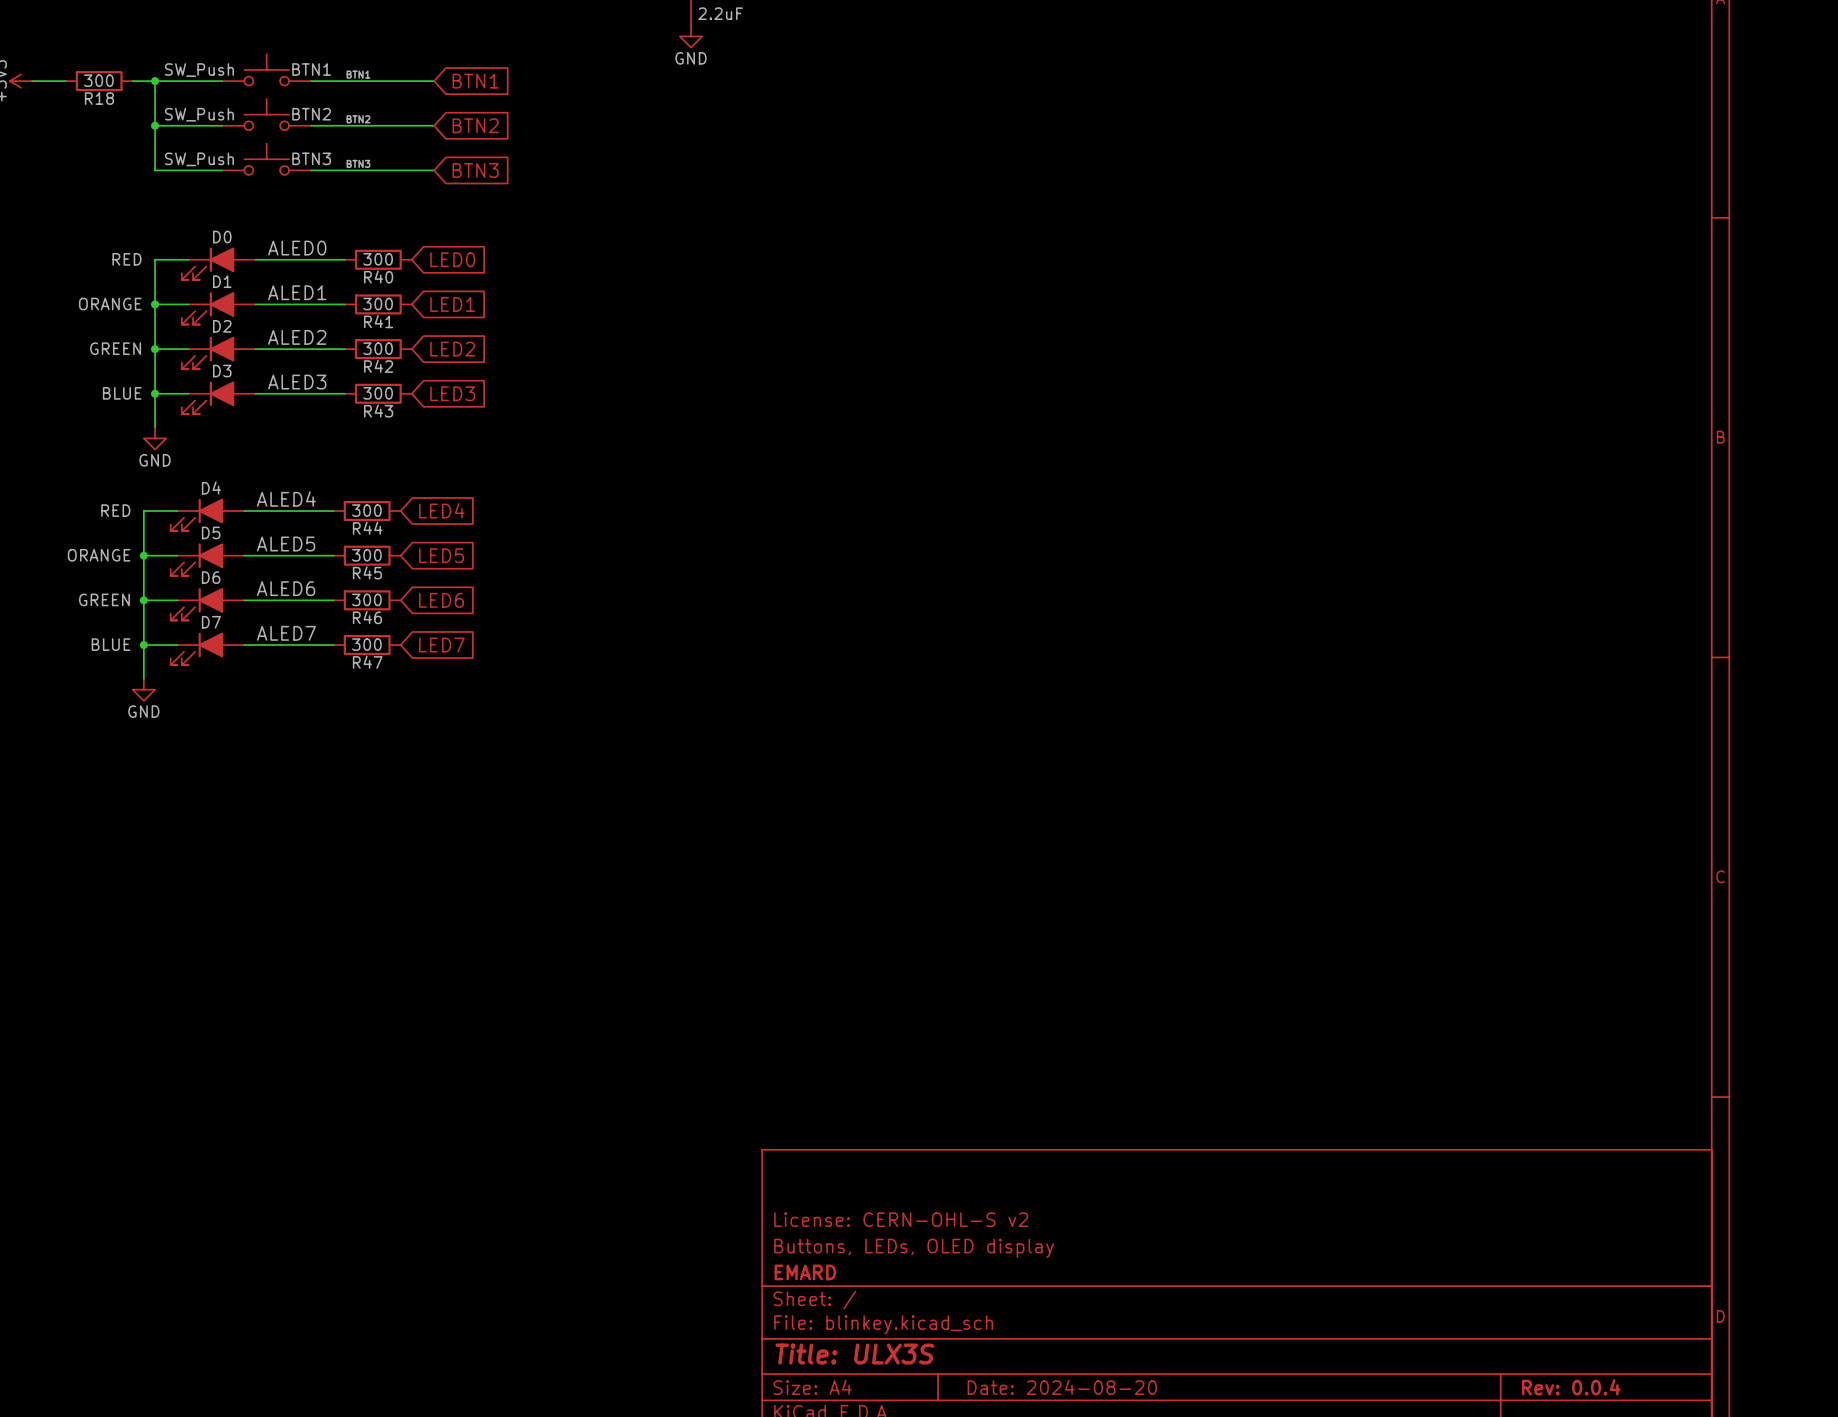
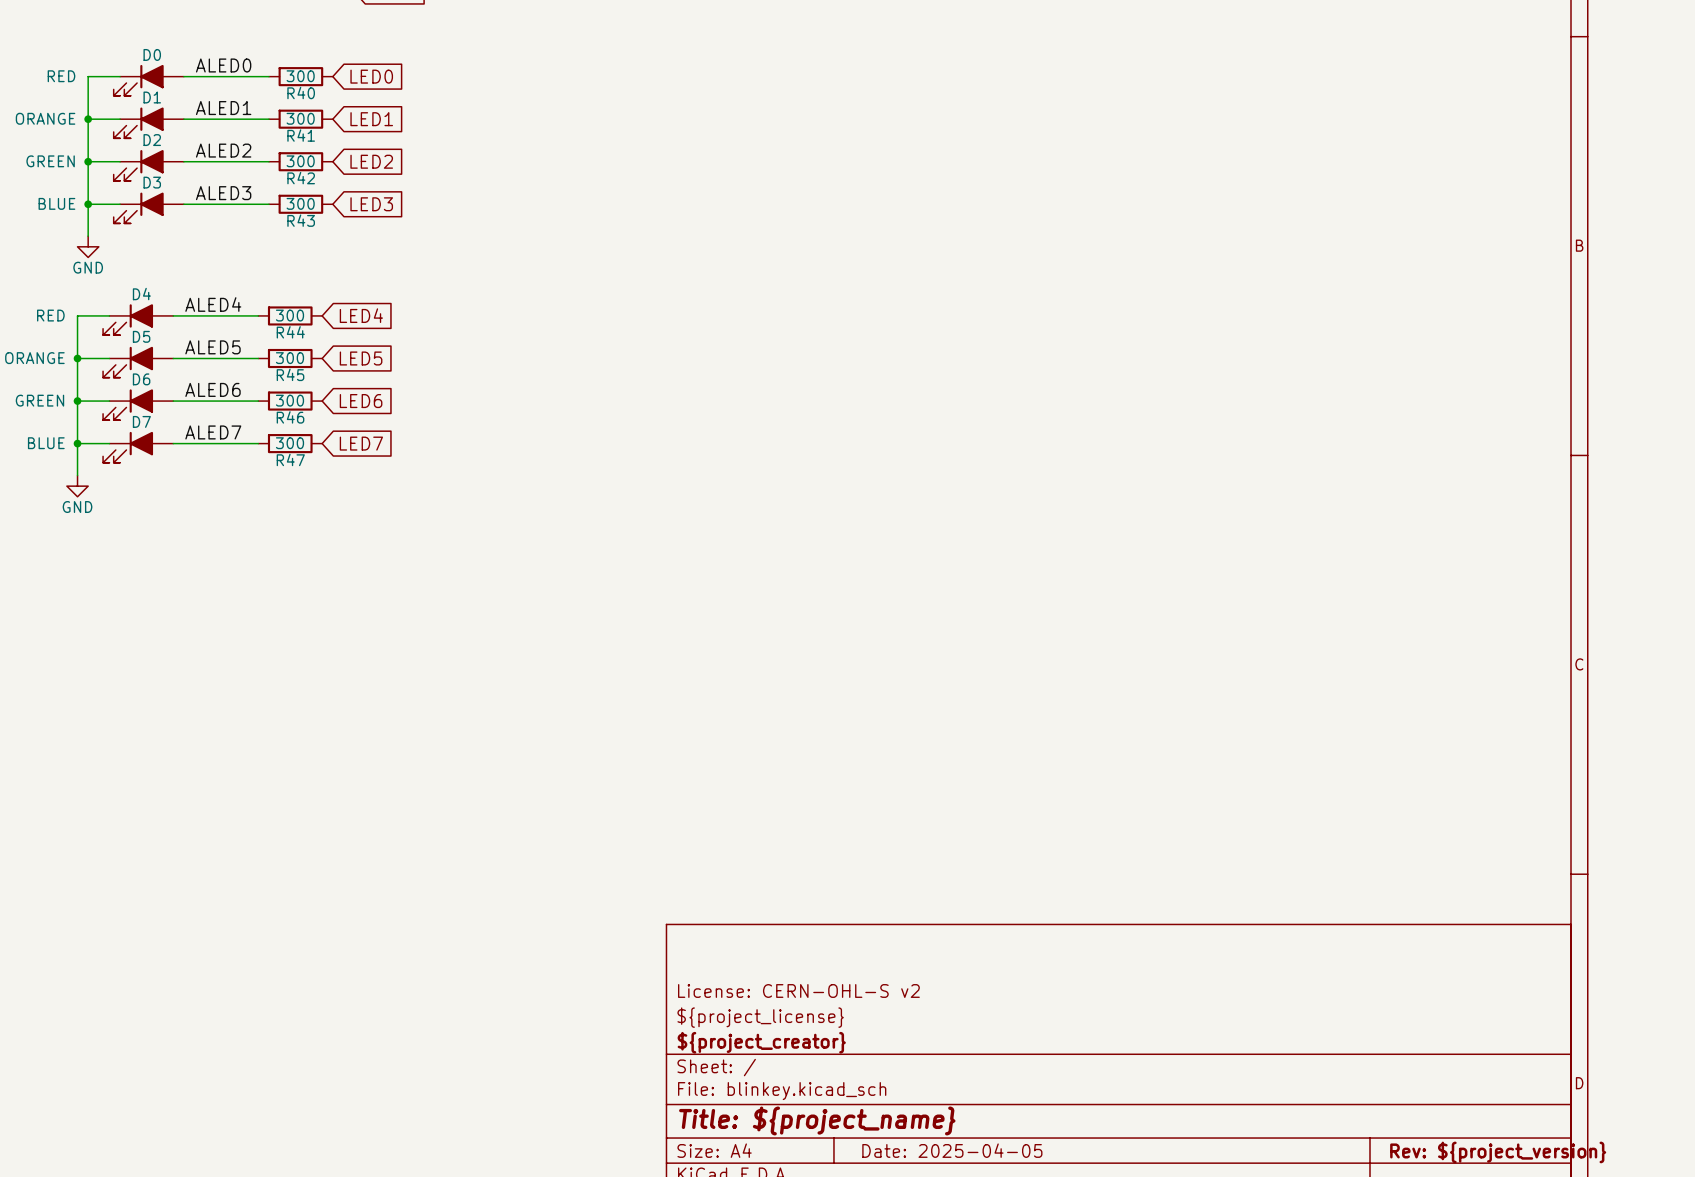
title block: Buttons, LEDs, OLED display (914, 1248) -> ${project_license} (760, 1017)
title block: EMARD (805, 1272) -> ${project_creator} (761, 1042)
title block: Title: ULX3S (854, 1354) -> Title: ${project_name} (817, 1120)
title block: Date: 2024-08-20 (1062, 1387) -> Date: 2025-04-05 (952, 1150)
title block: Rev: 0.0.4 (1571, 1387) -> Rev: ${project_version} (1498, 1152)

